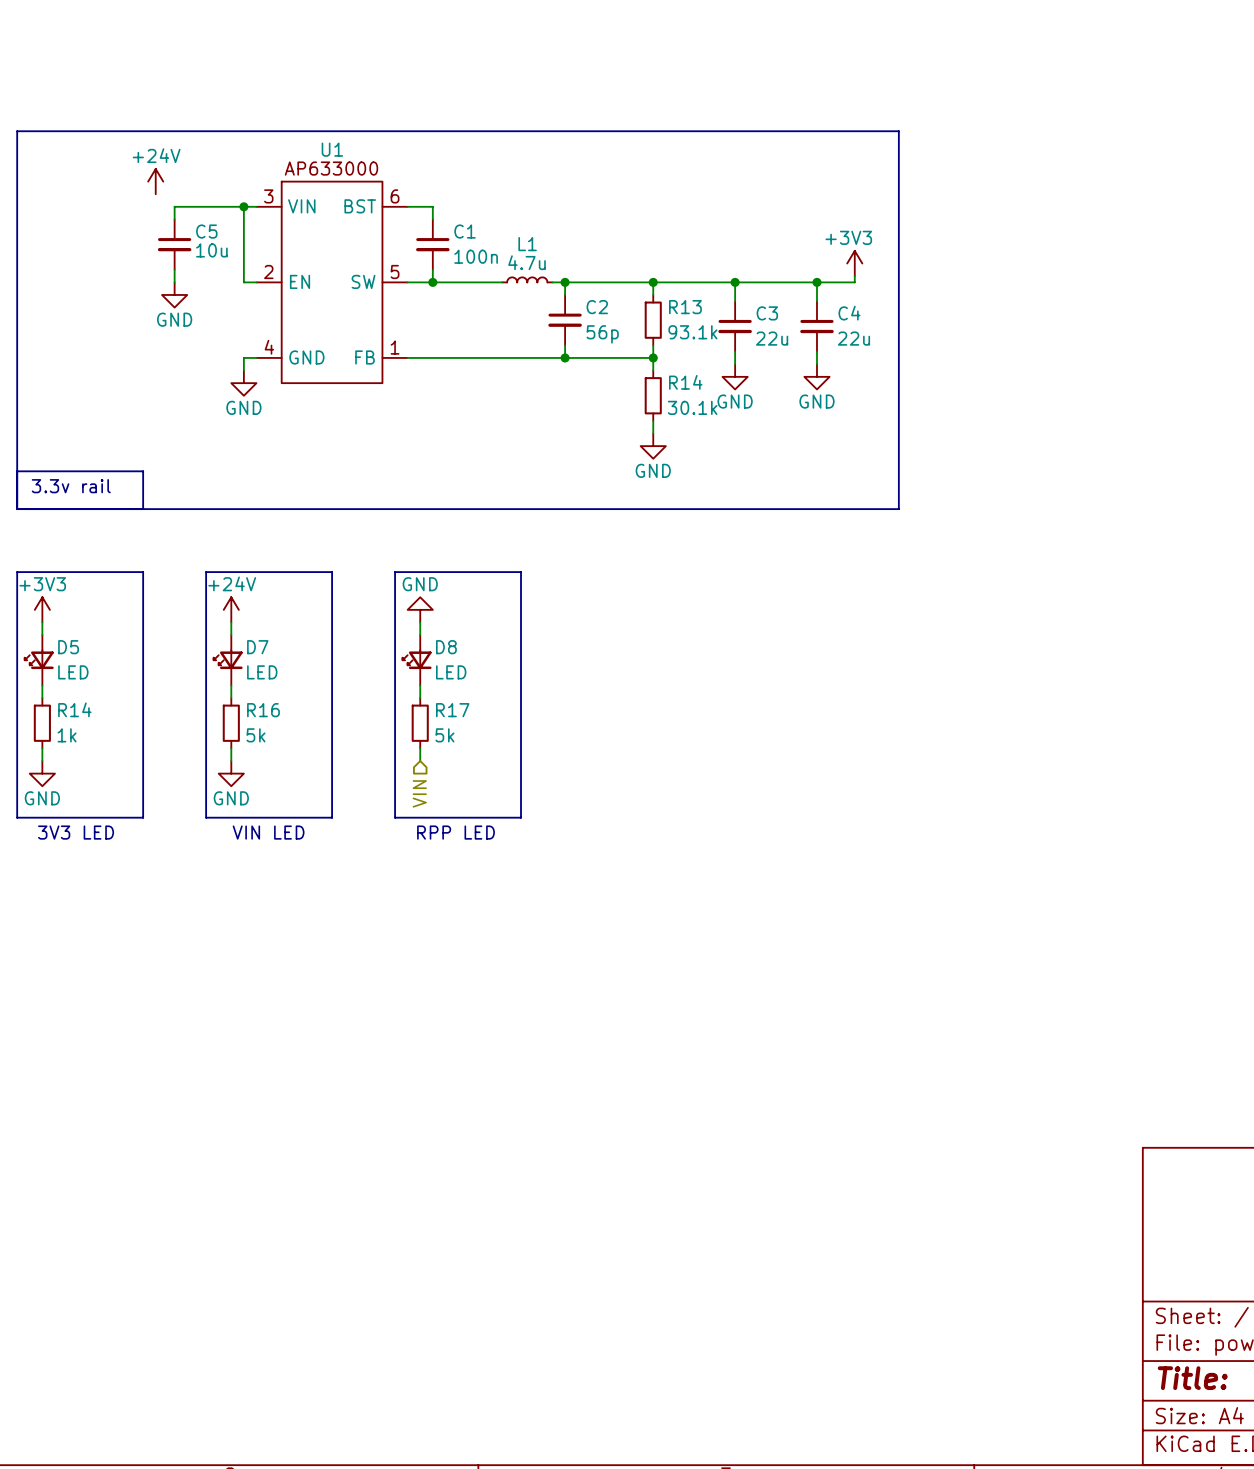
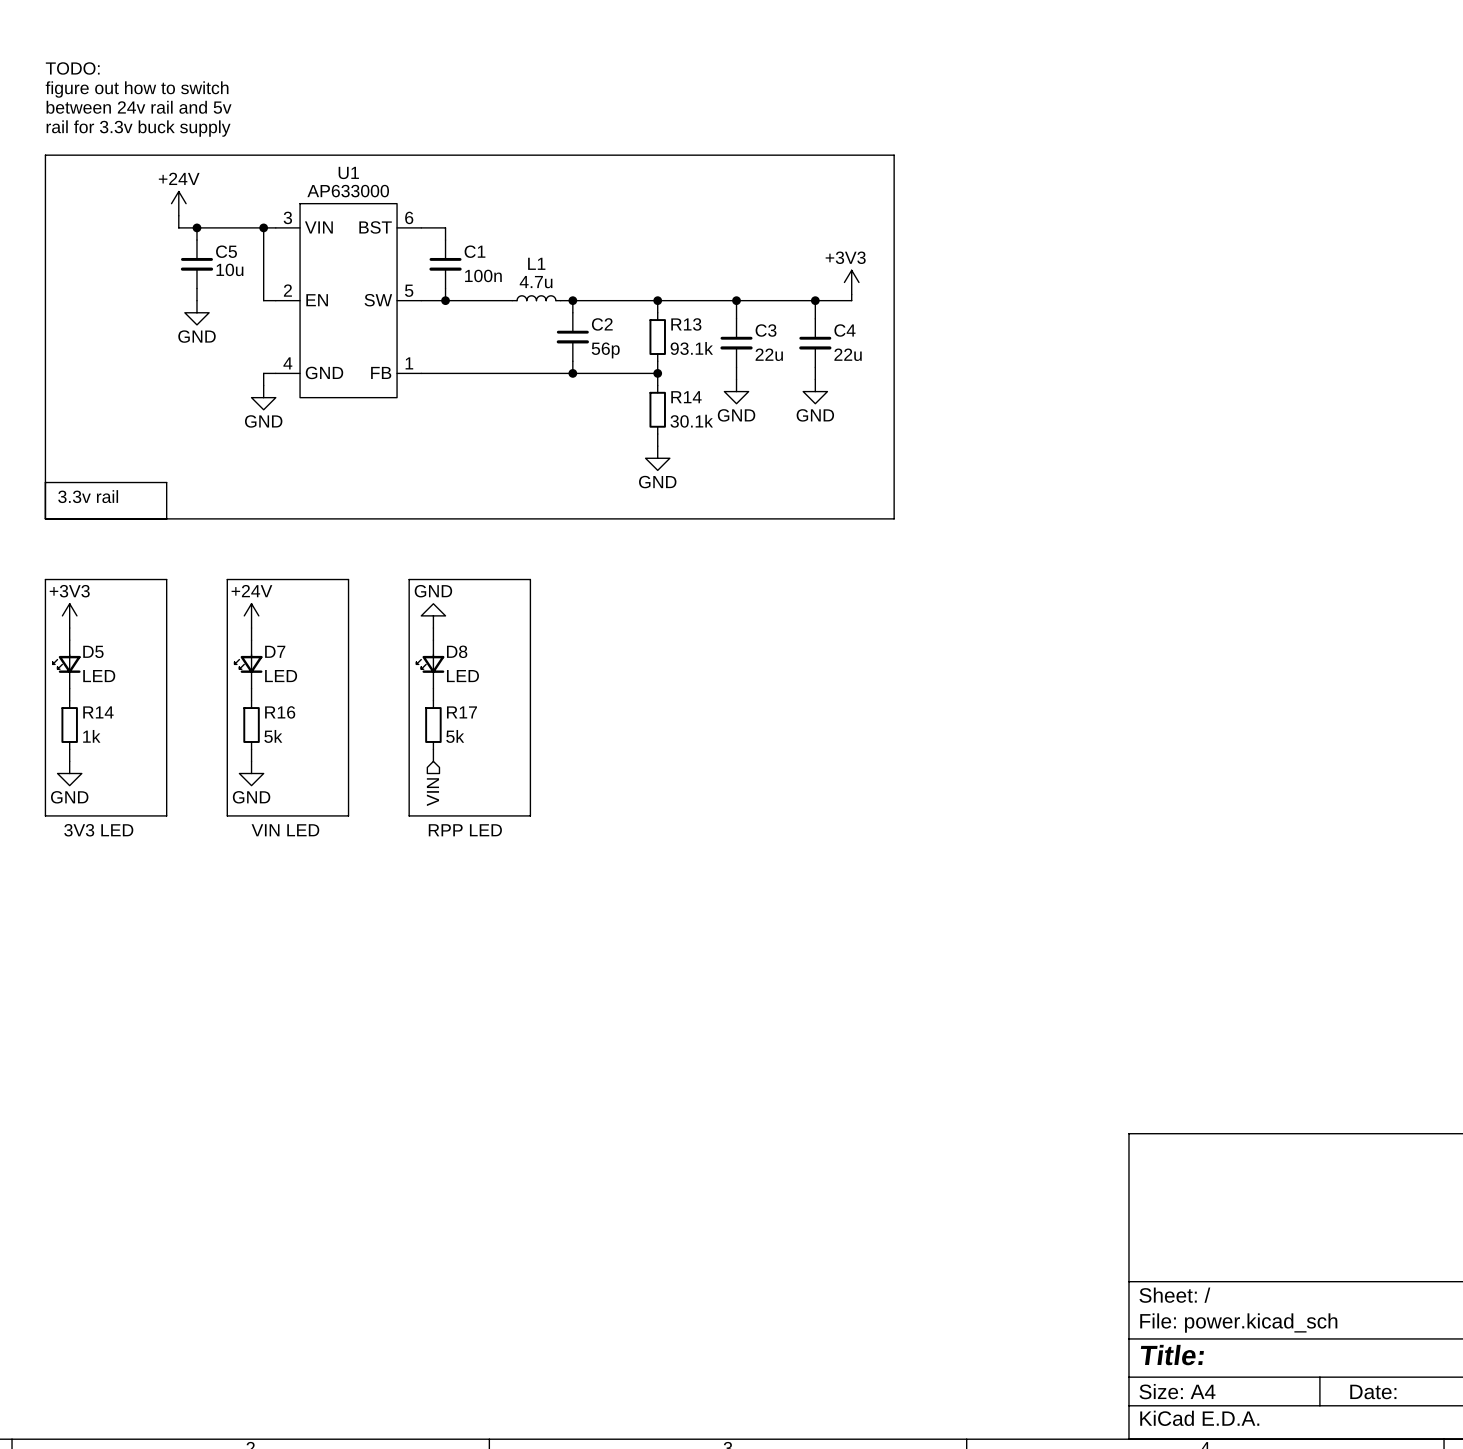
text: none -> TODO: (72, 68)
text: none -> figure out how to switch (137, 89)
text: none -> between 24v rail and 5v (139, 107)
text: none -> rail for 3.3v buck supply (138, 128)
wire: none -> (178, 215) (178, 227) (196, 227)
junction: none -> (196, 227)

